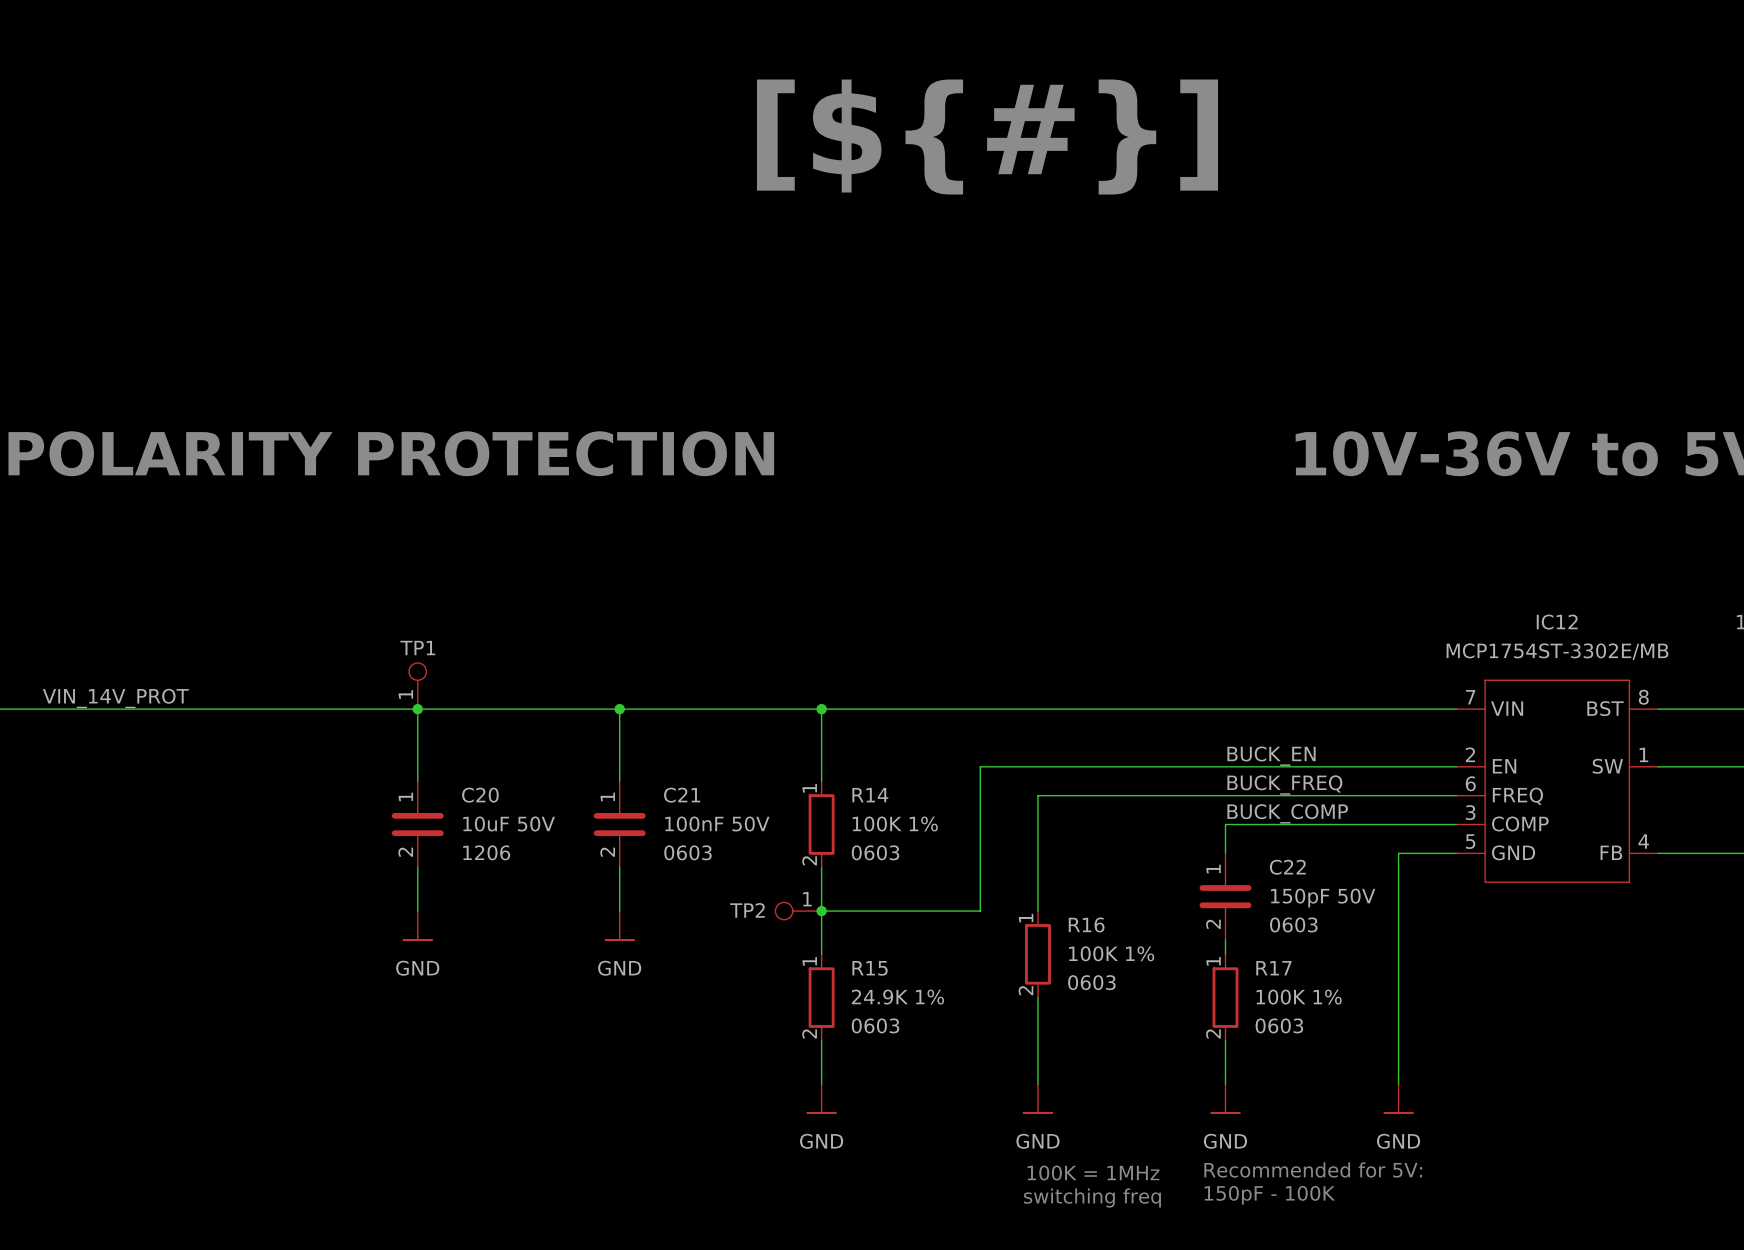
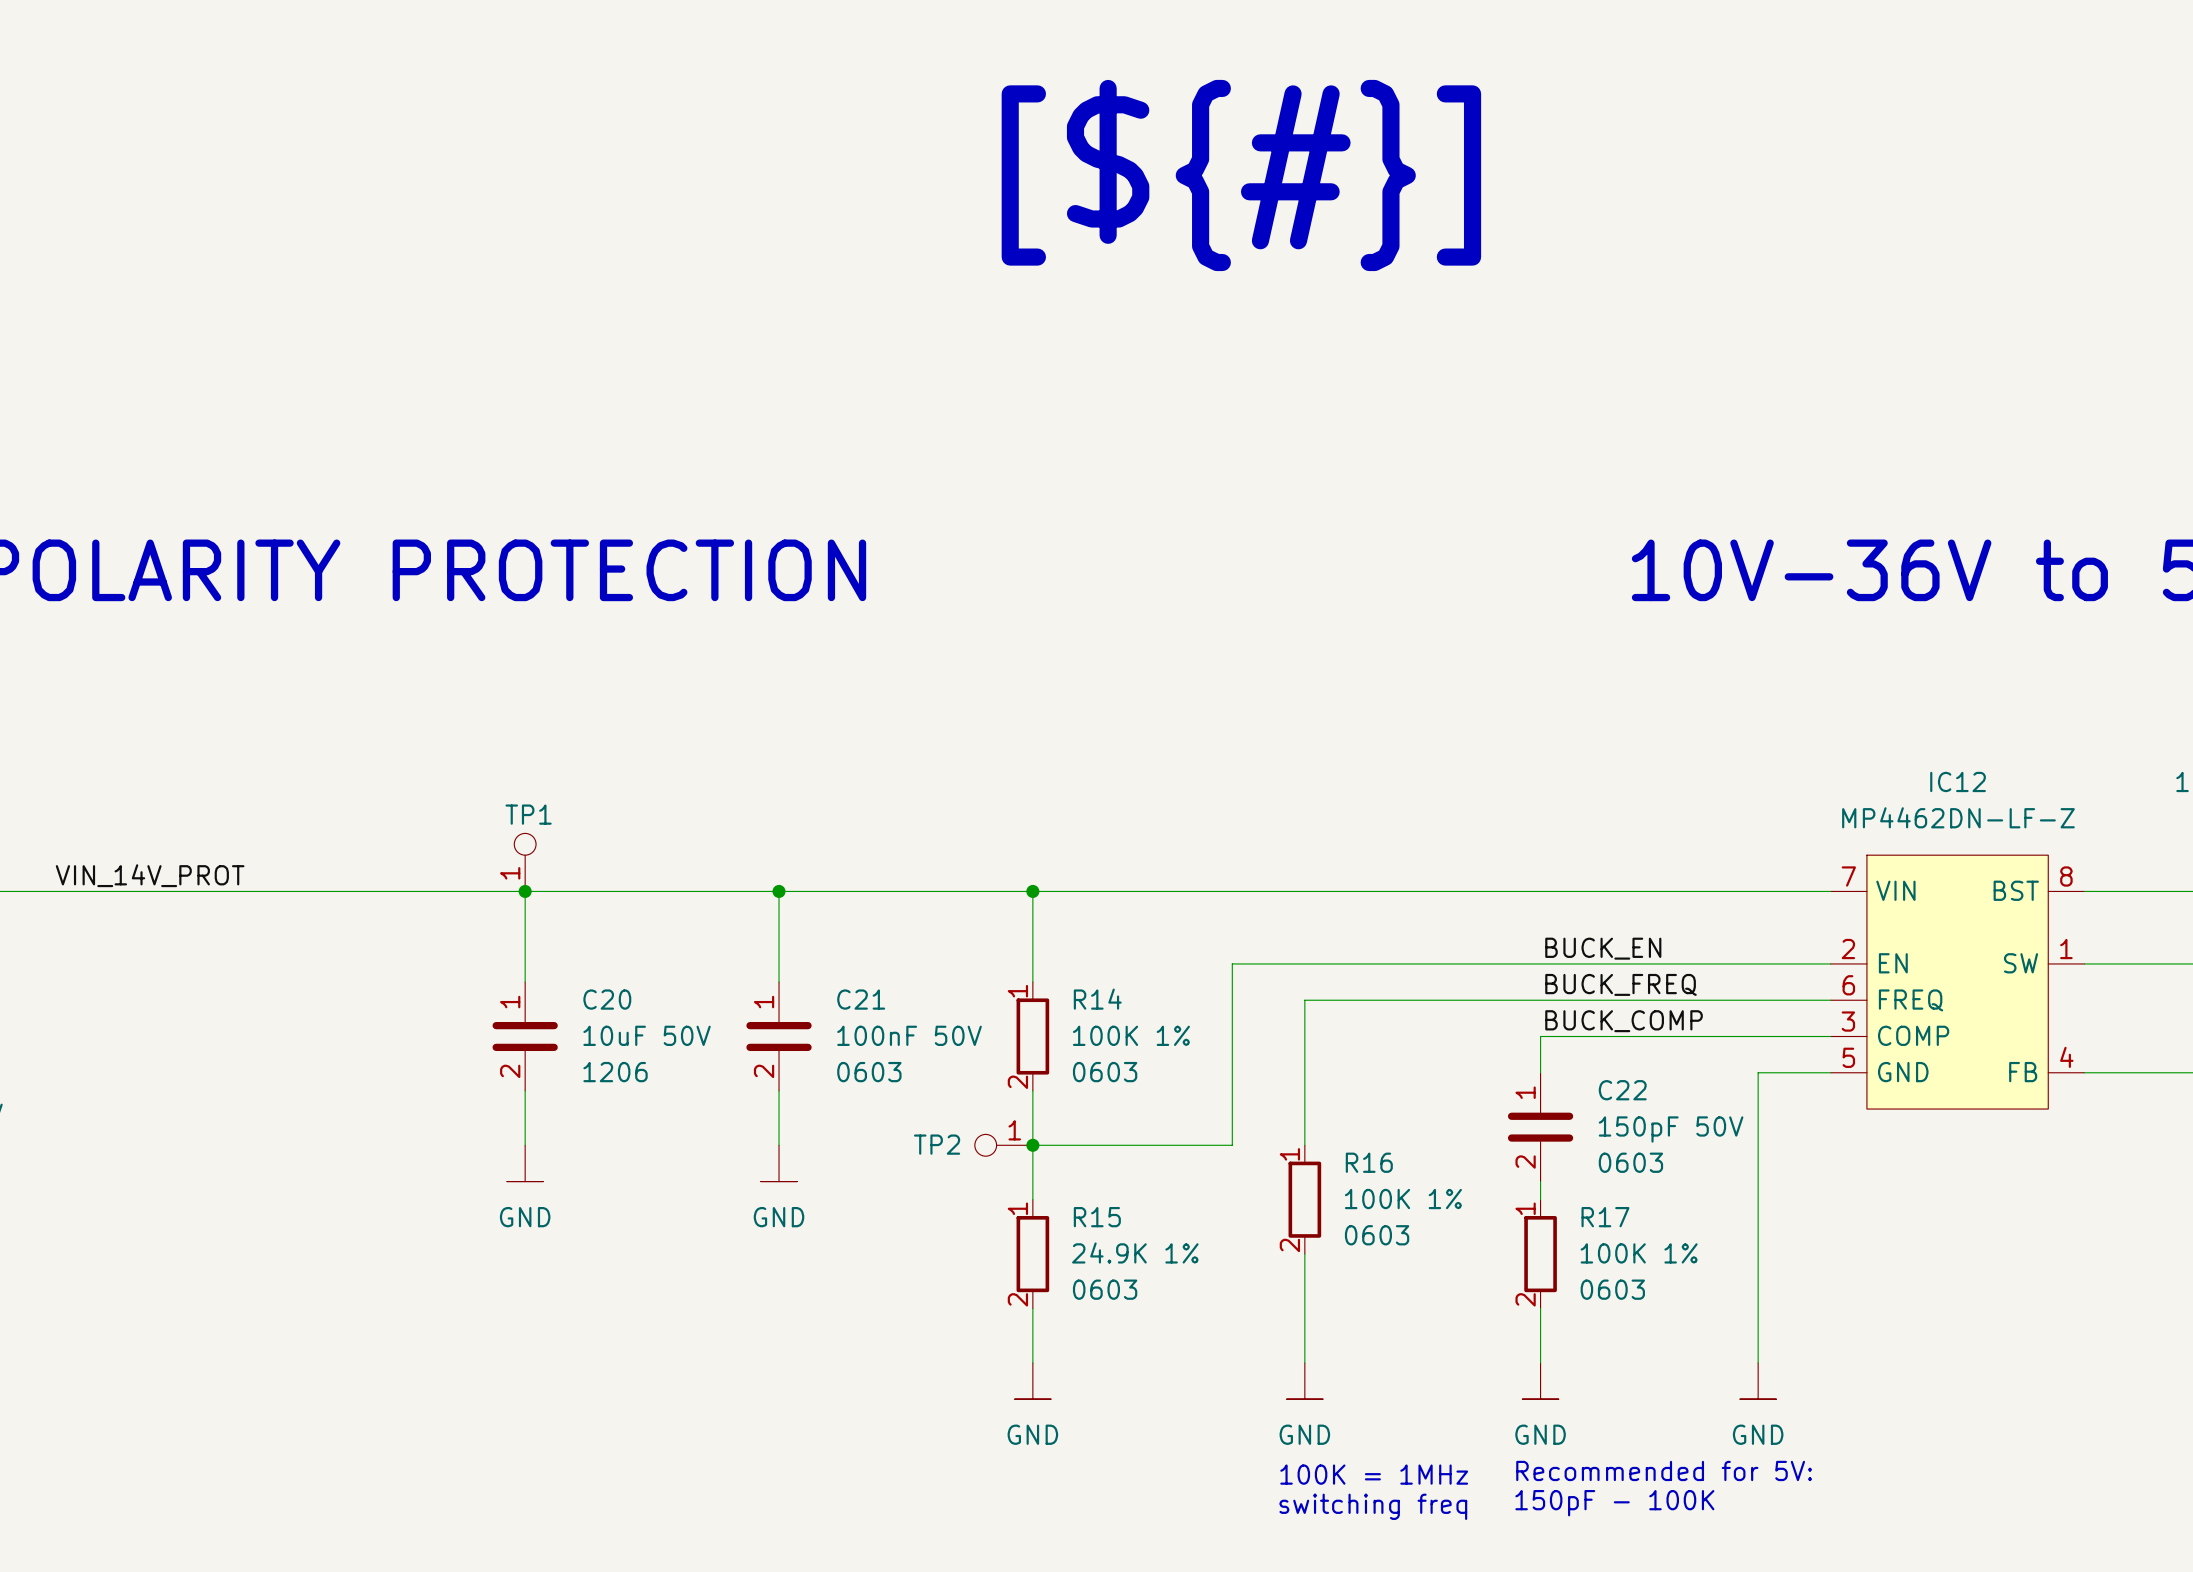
IC12 value: MCP1754ST-3302E/MB (1557, 651) -> MP4462DN-LF-Z (1958, 817)

